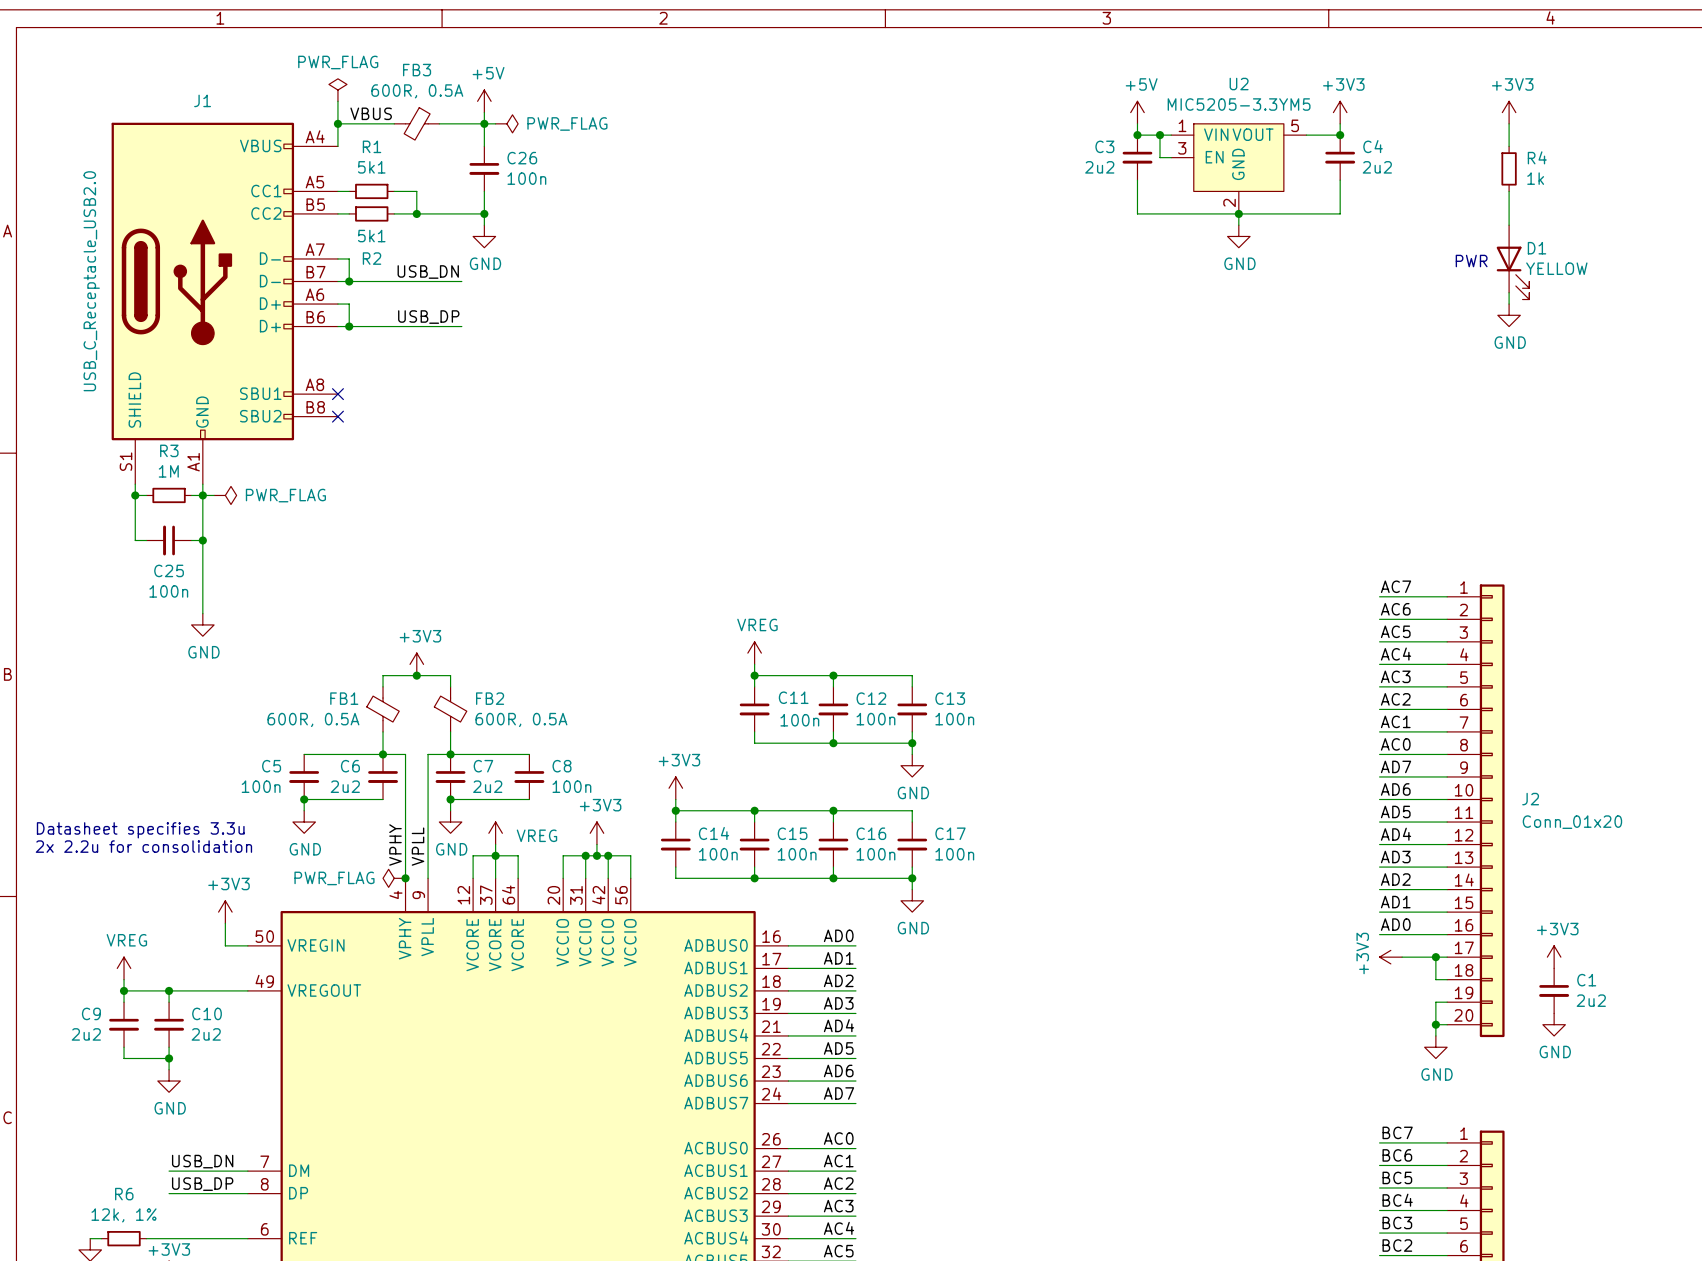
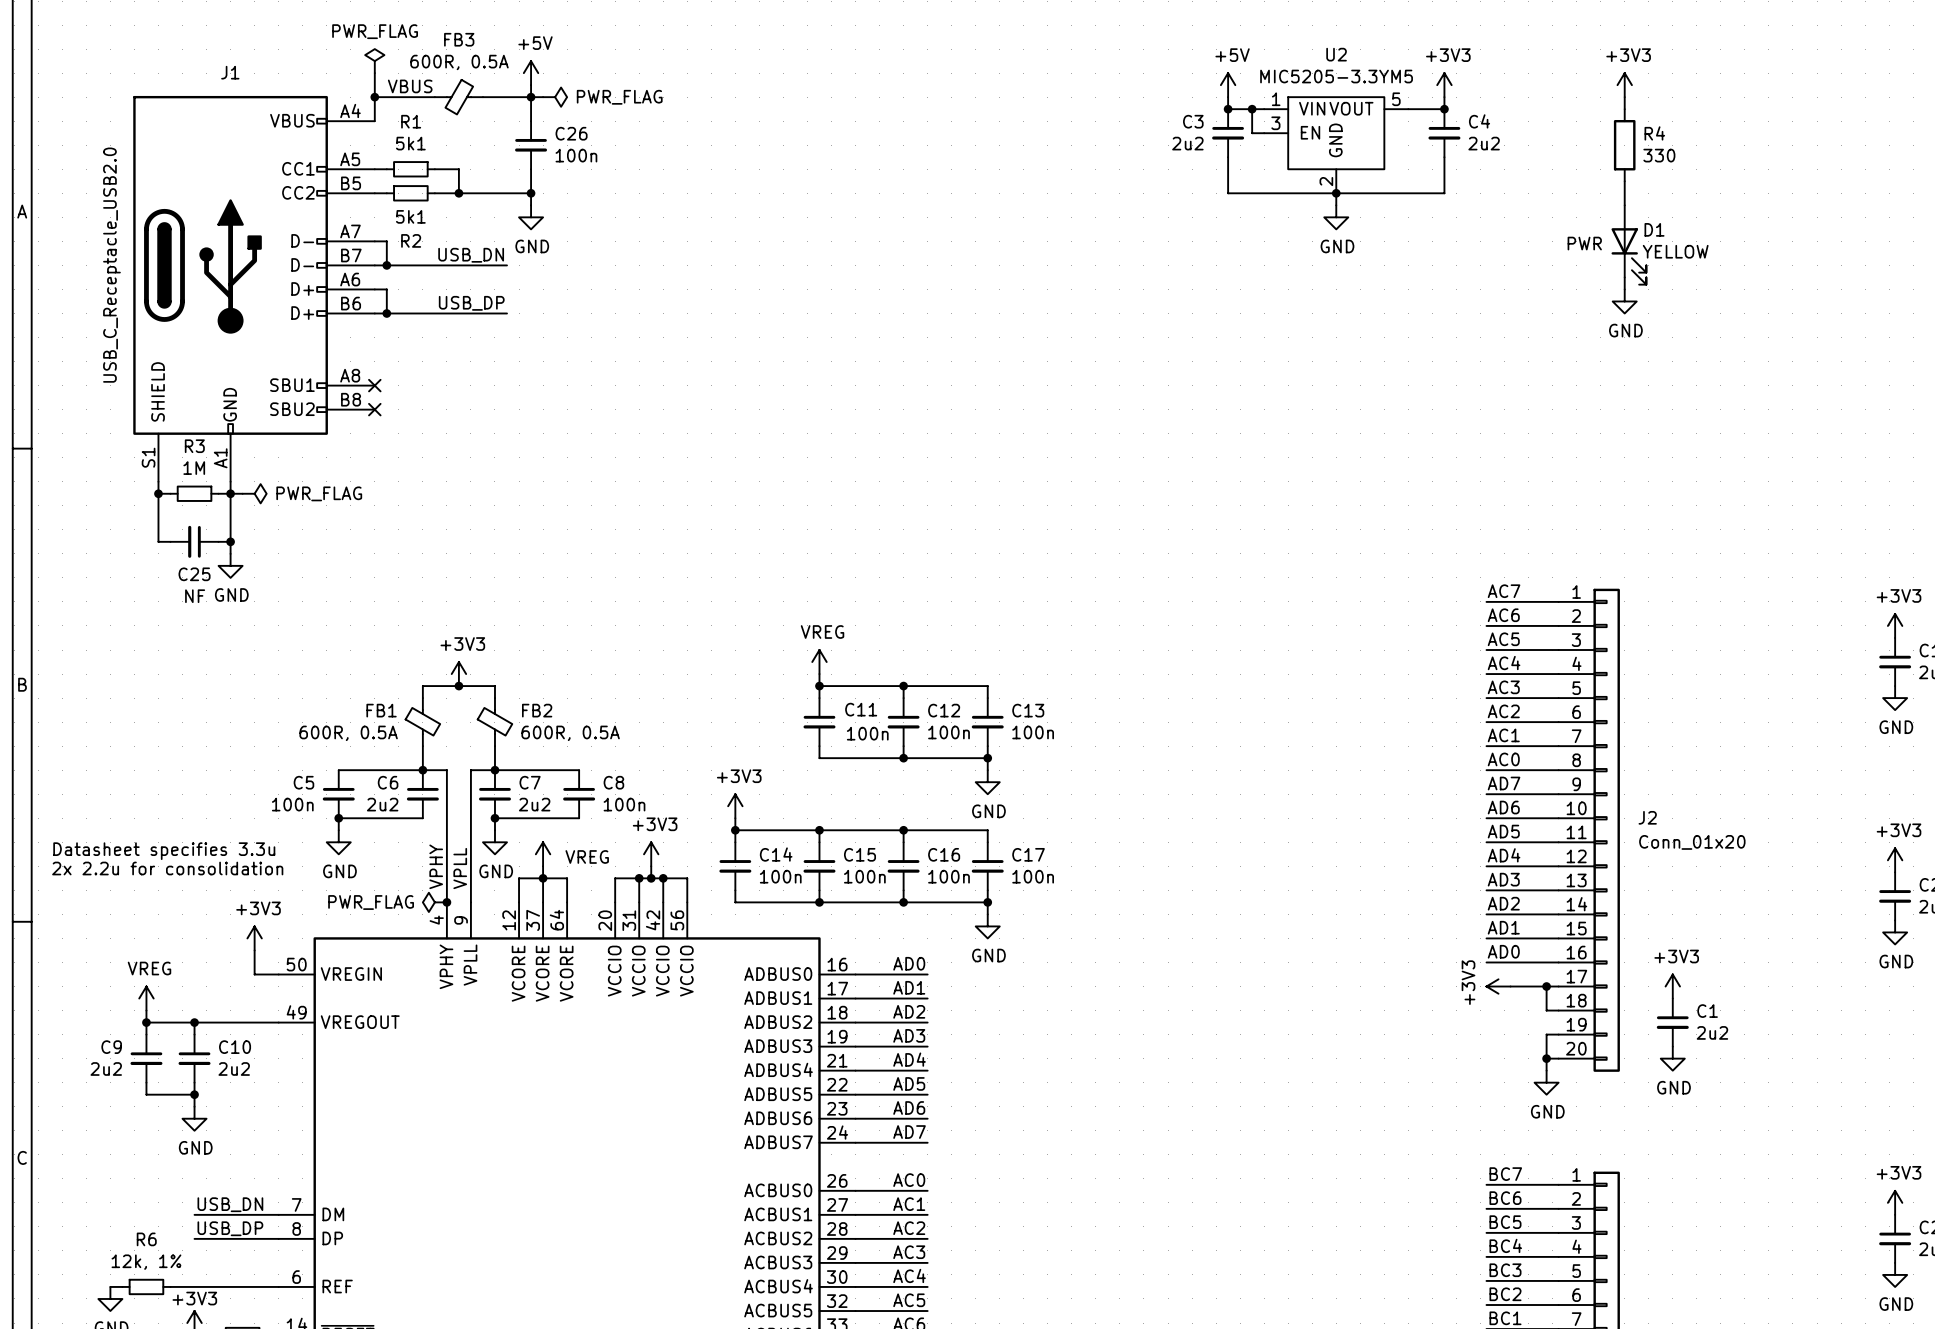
R4 symbol: [1501, 146, 1517, 192] -> [1613, 109, 1636, 182]
R4 value: 1k (1535, 178) -> 330 (1659, 155)
wire: (202, 551) (202, 613) -> none
C25 value: 100n (168, 591) -> NF (195, 596)
power symbol position: GND (202, 624) -> GND (230, 565)

